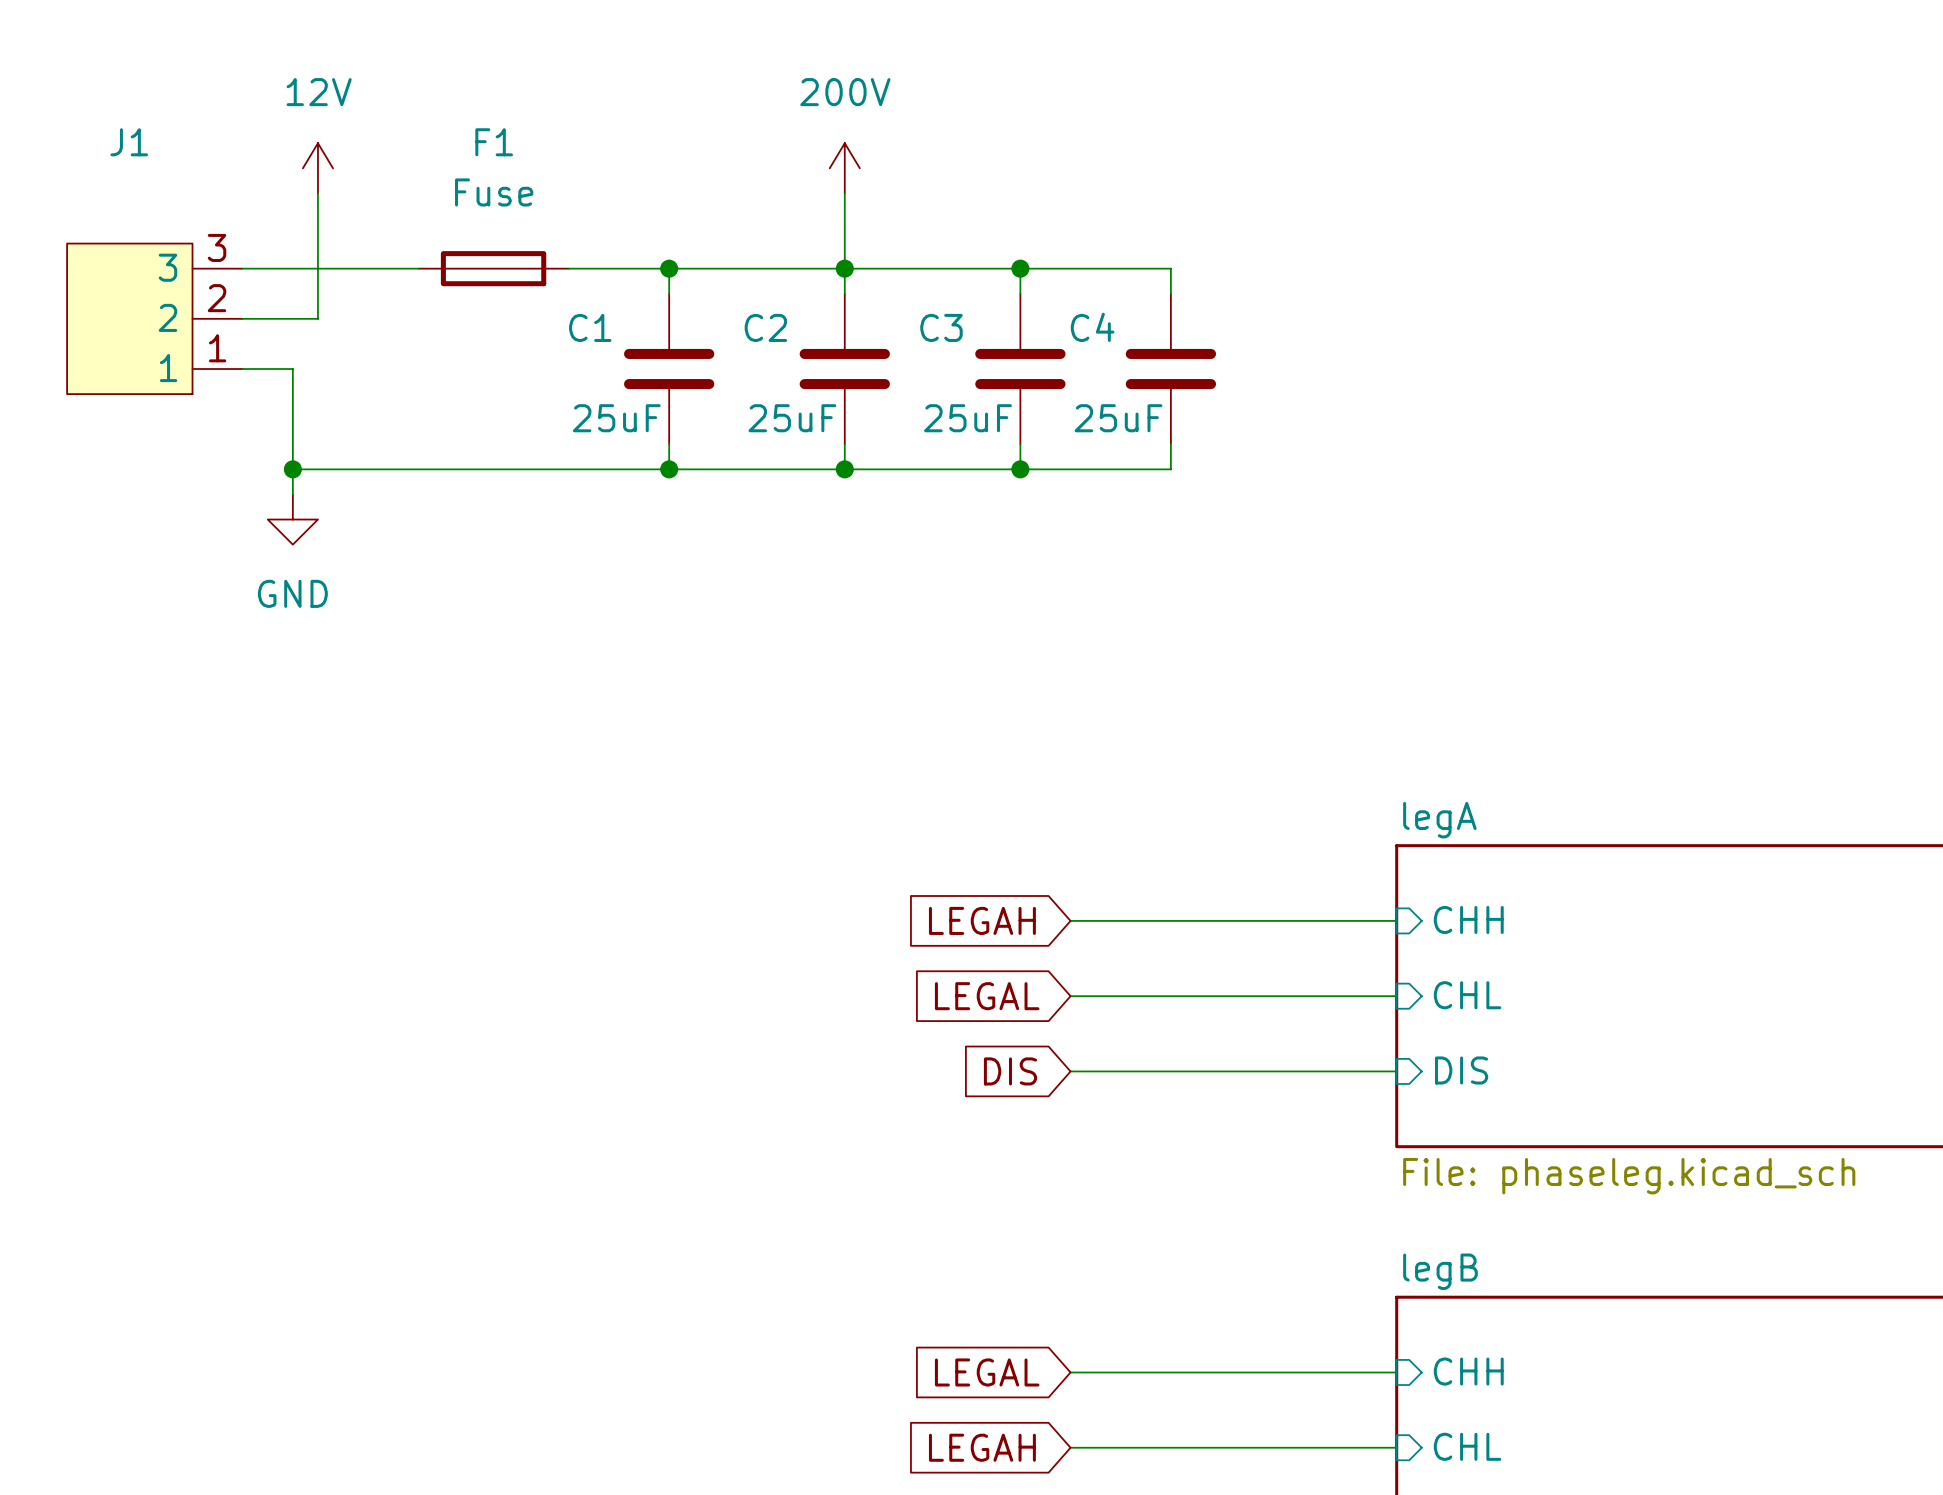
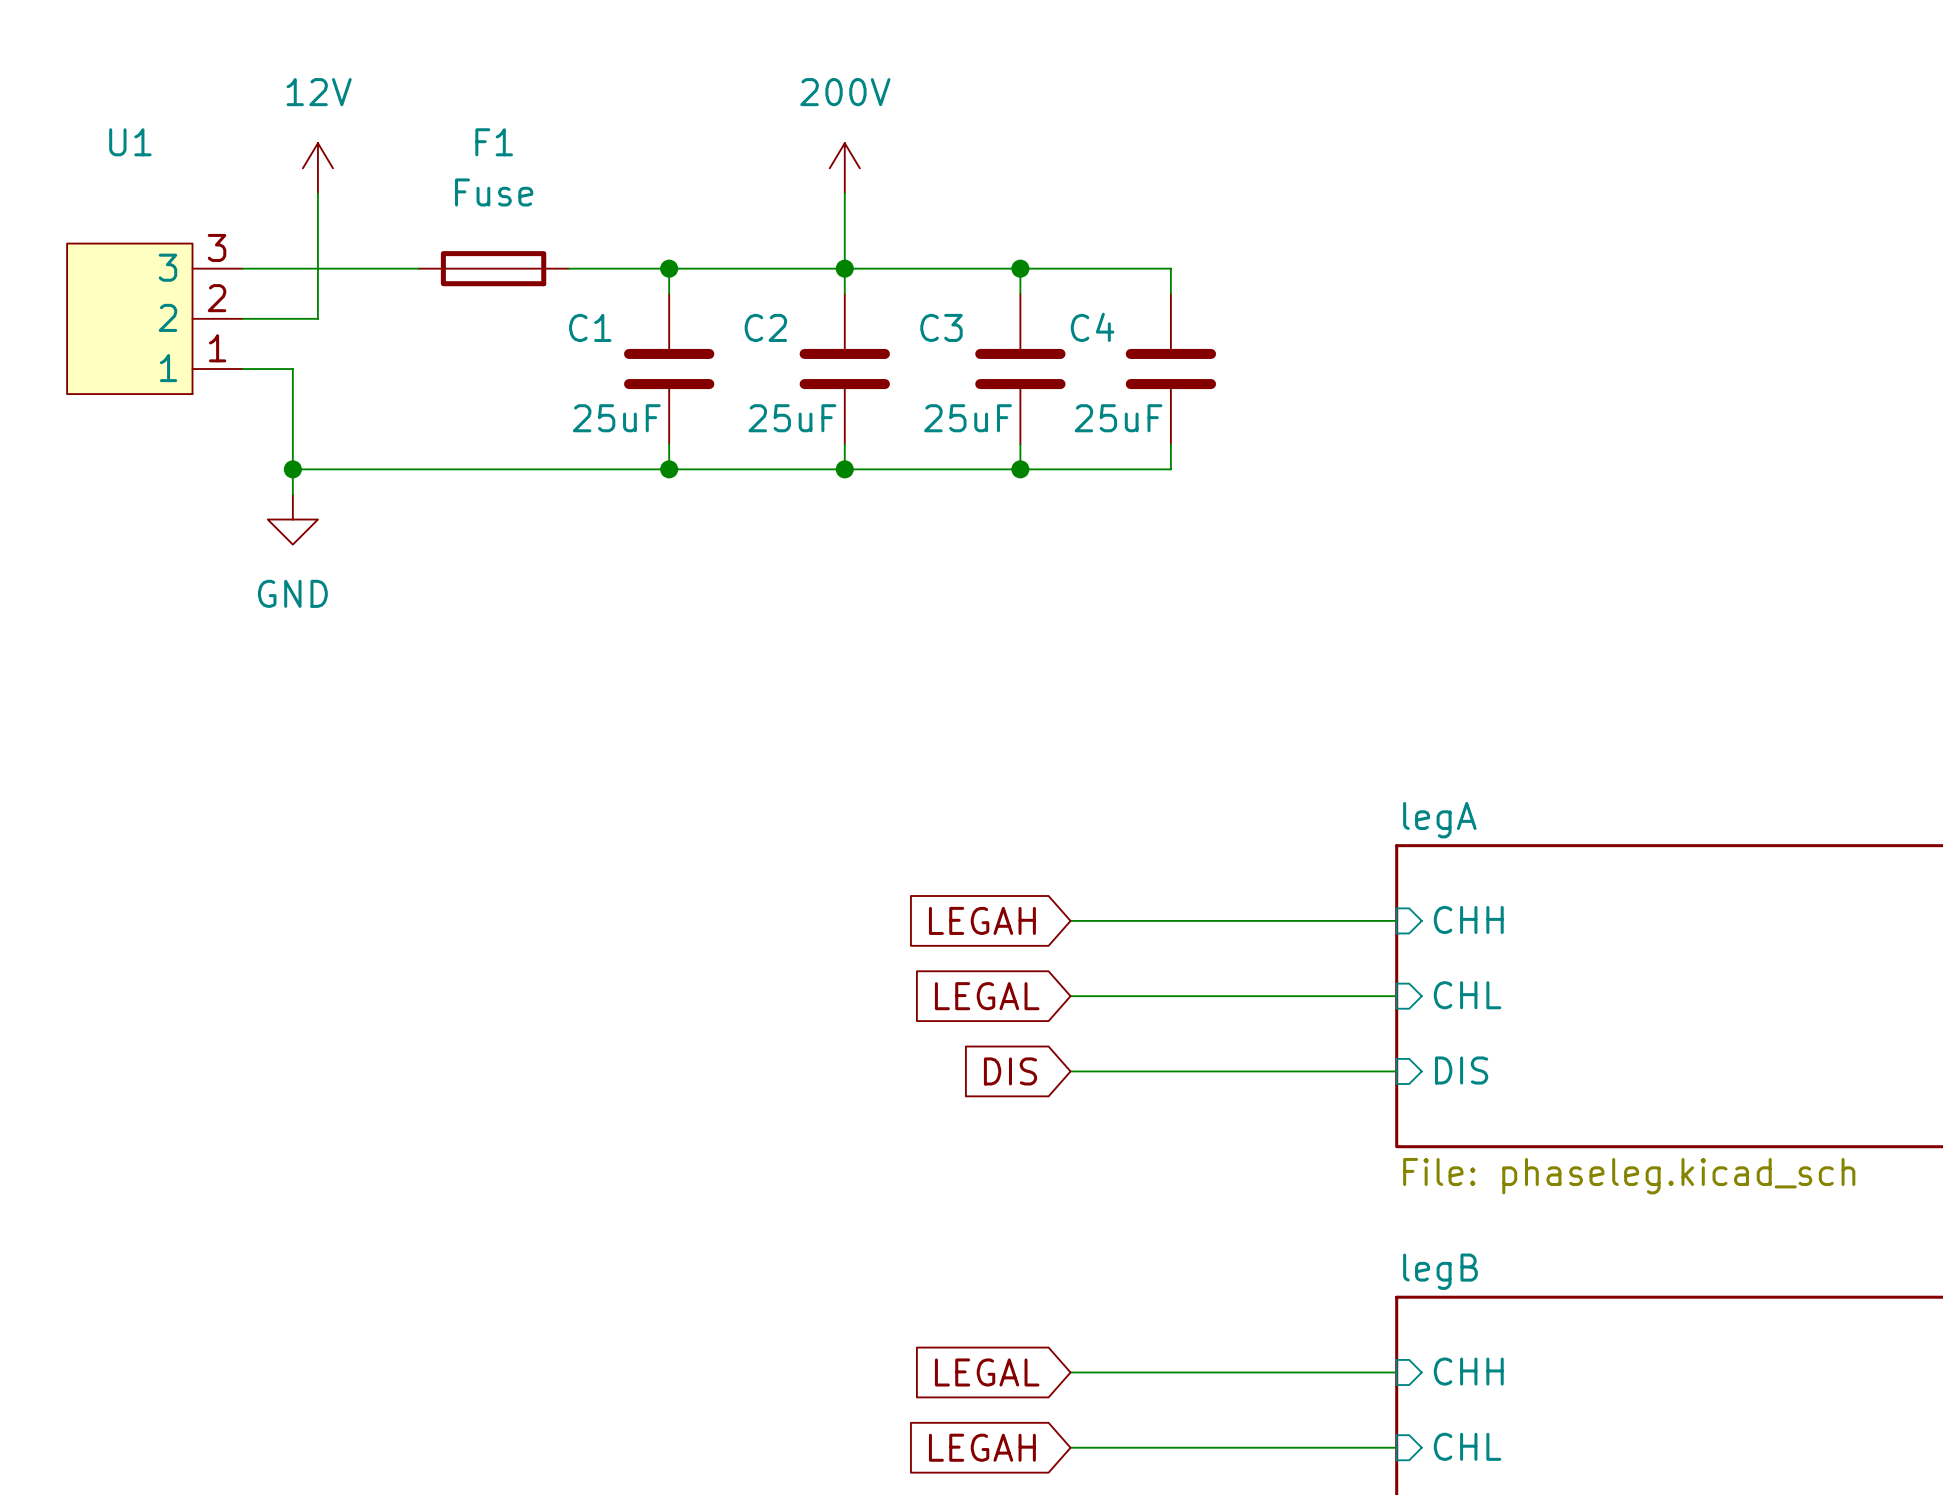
J1 name: J1 (129, 142) -> U1 (130, 142)

